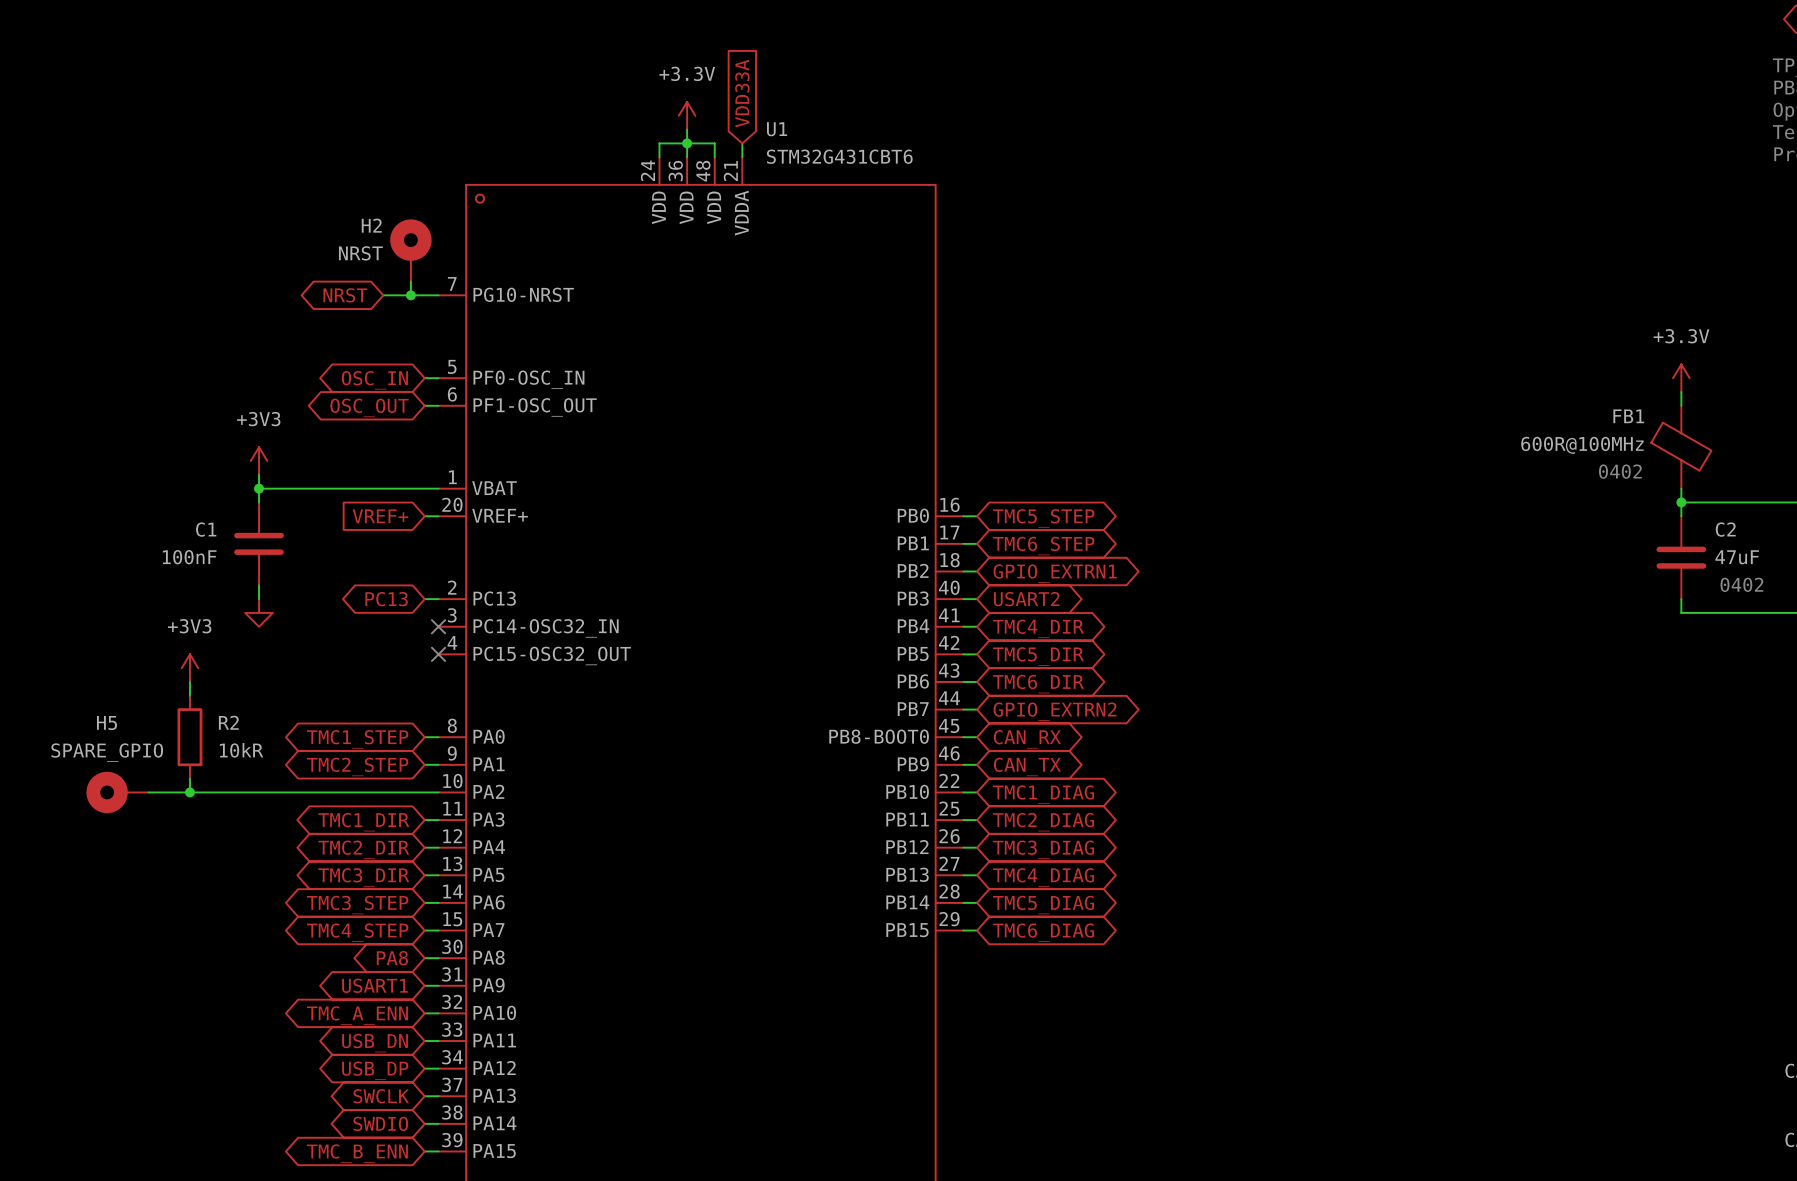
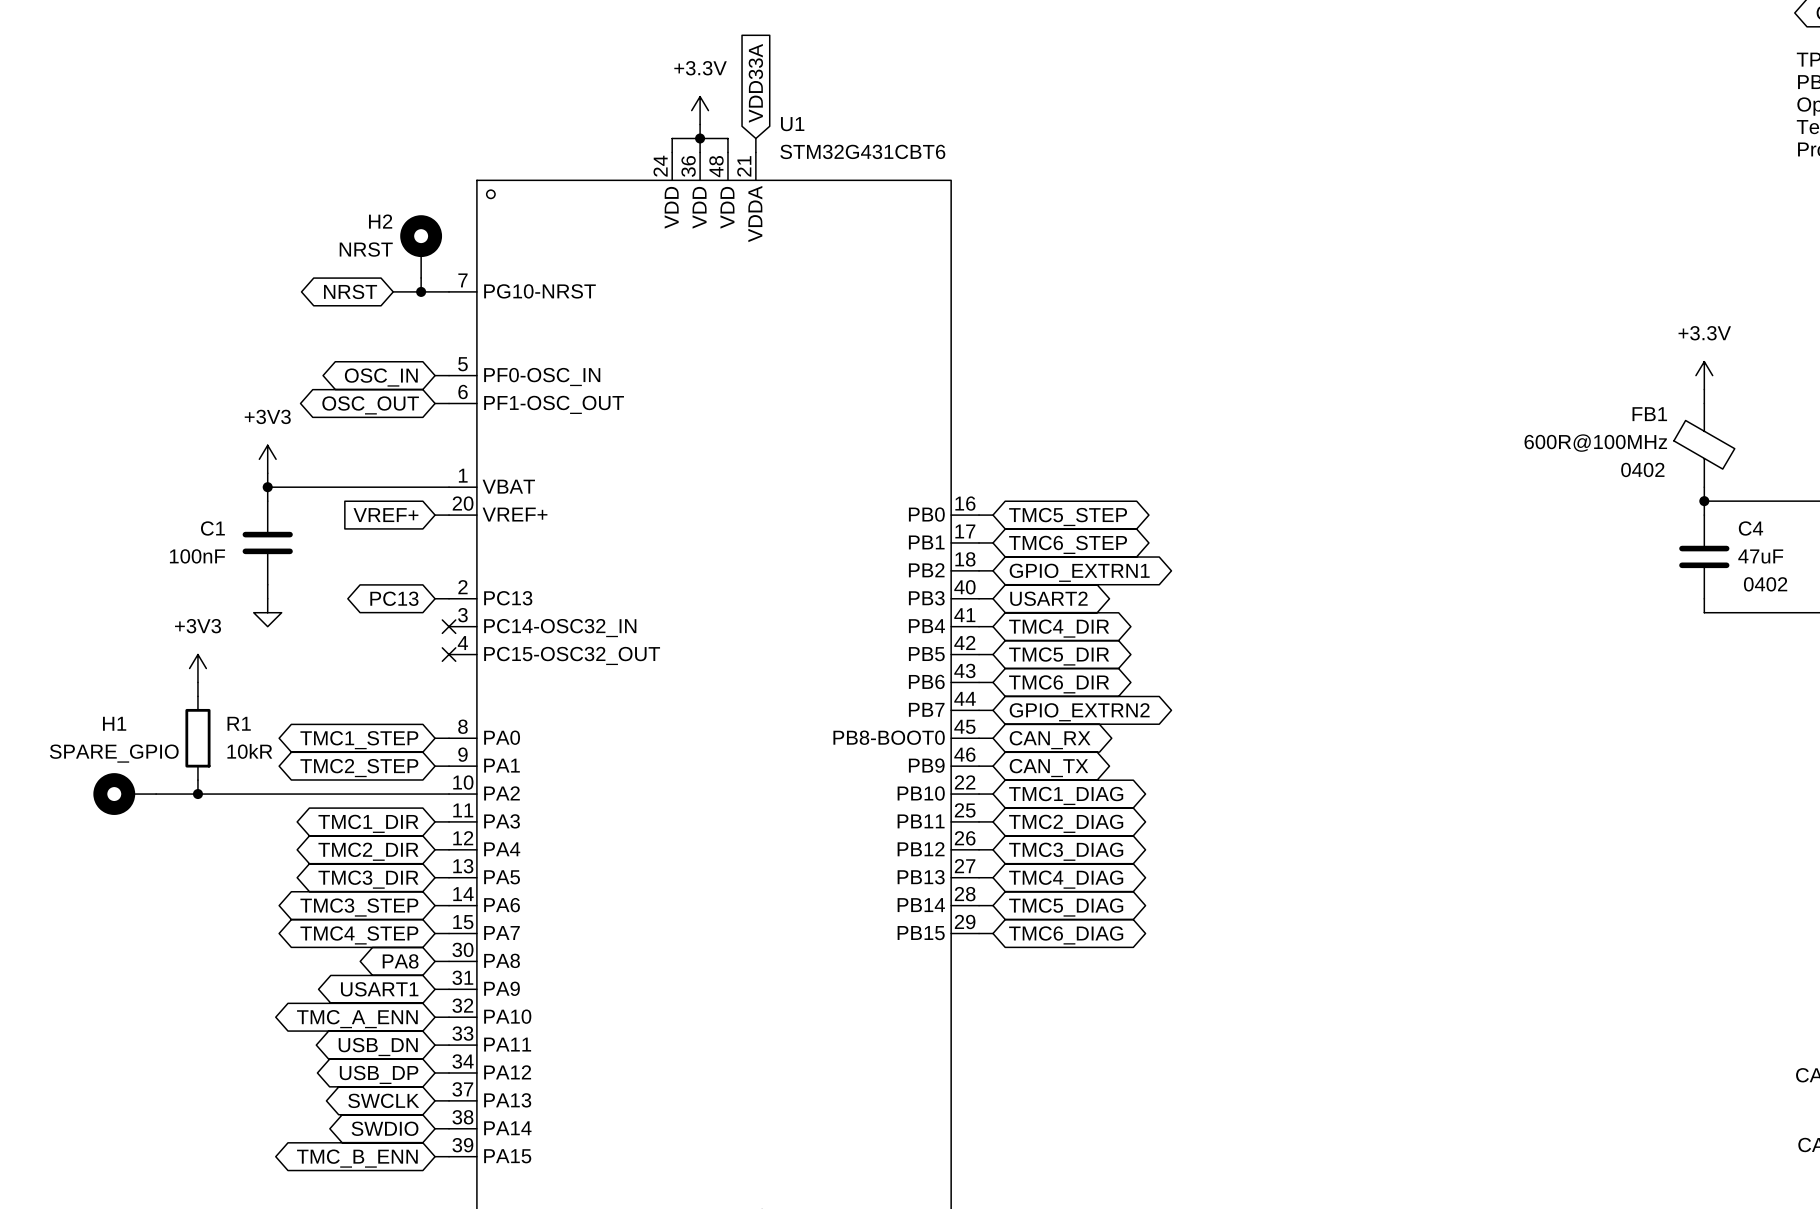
C2 name: C2 (1725, 529) -> C4 (1750, 528)
R2 name: R2 (228, 722) -> R1 (239, 723)
H5 name: H5 (106, 723) -> H1 (114, 723)

